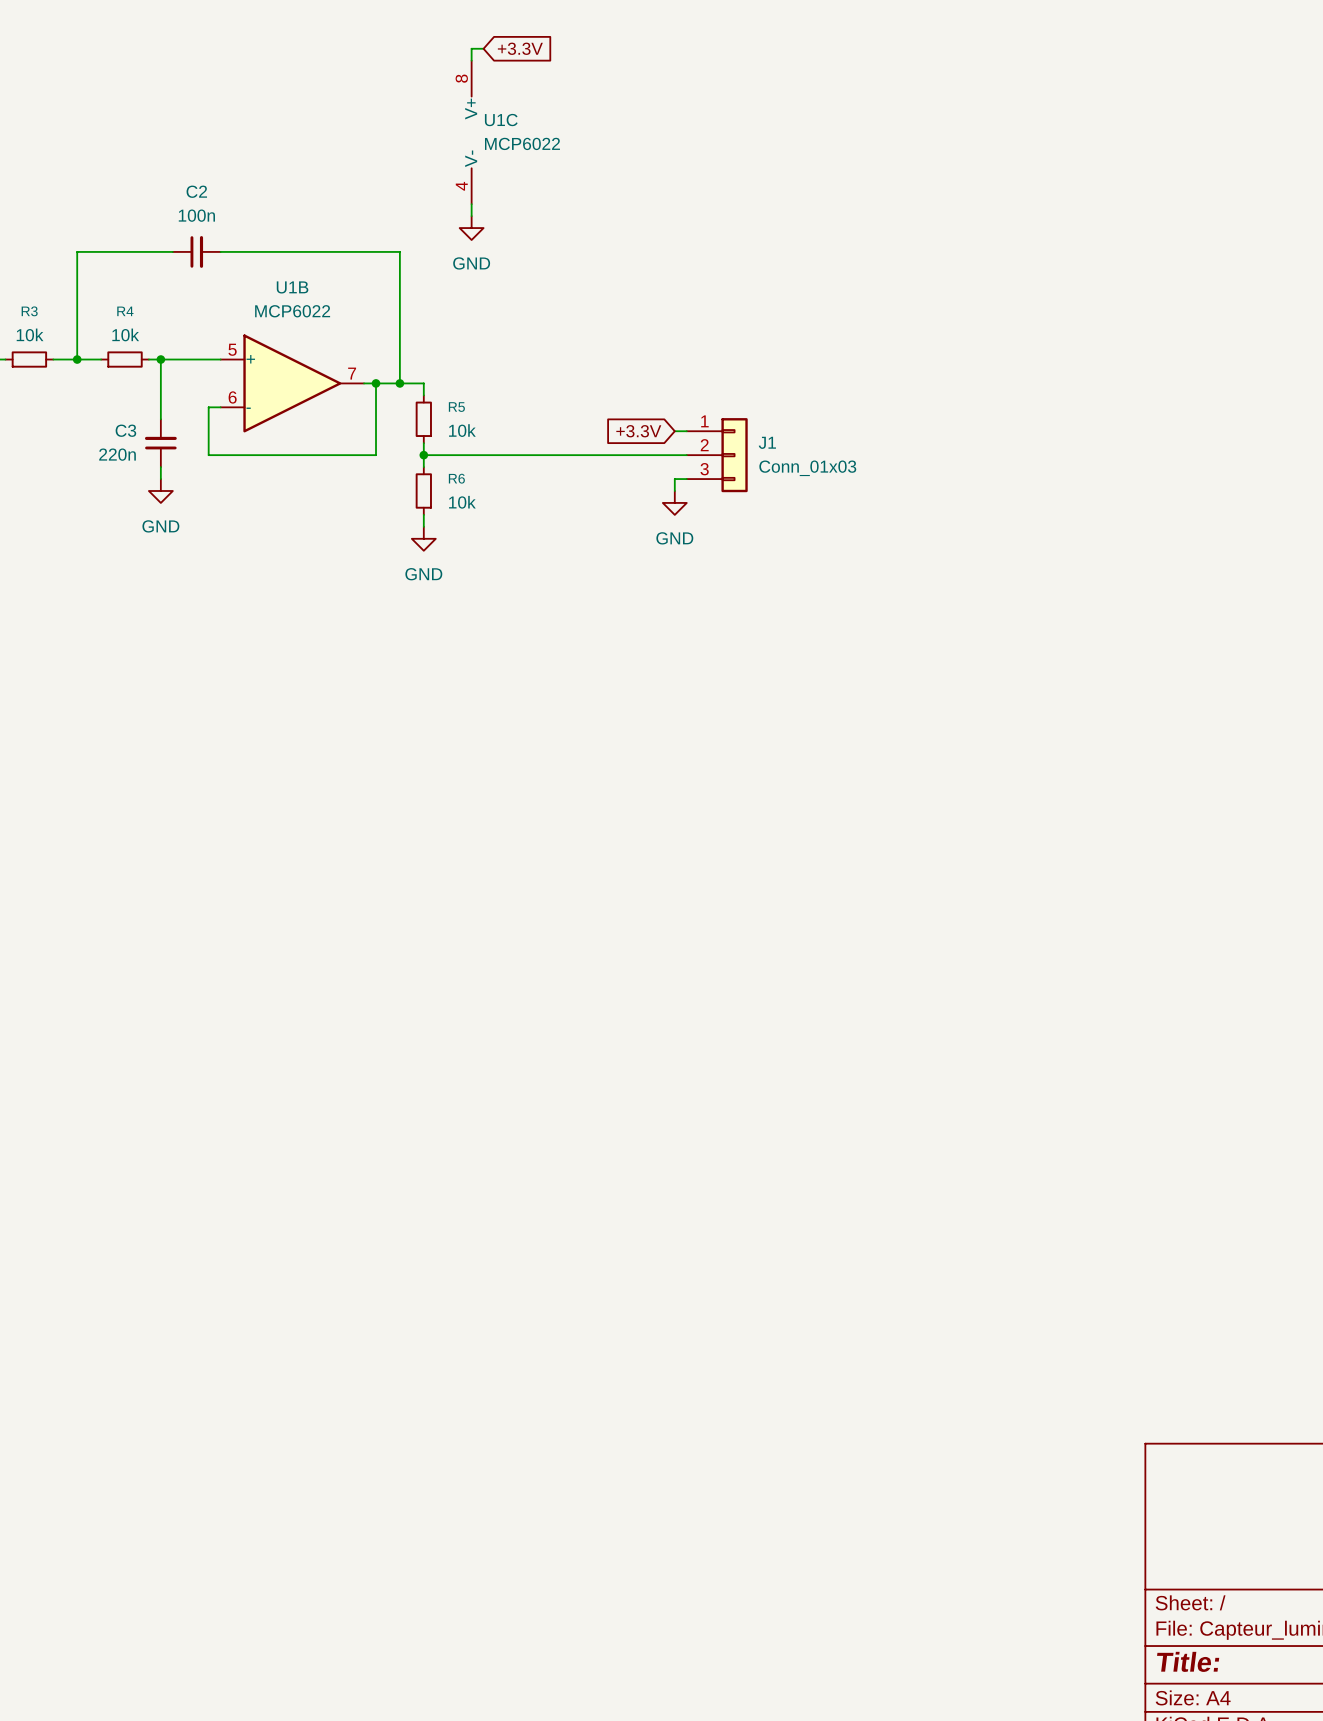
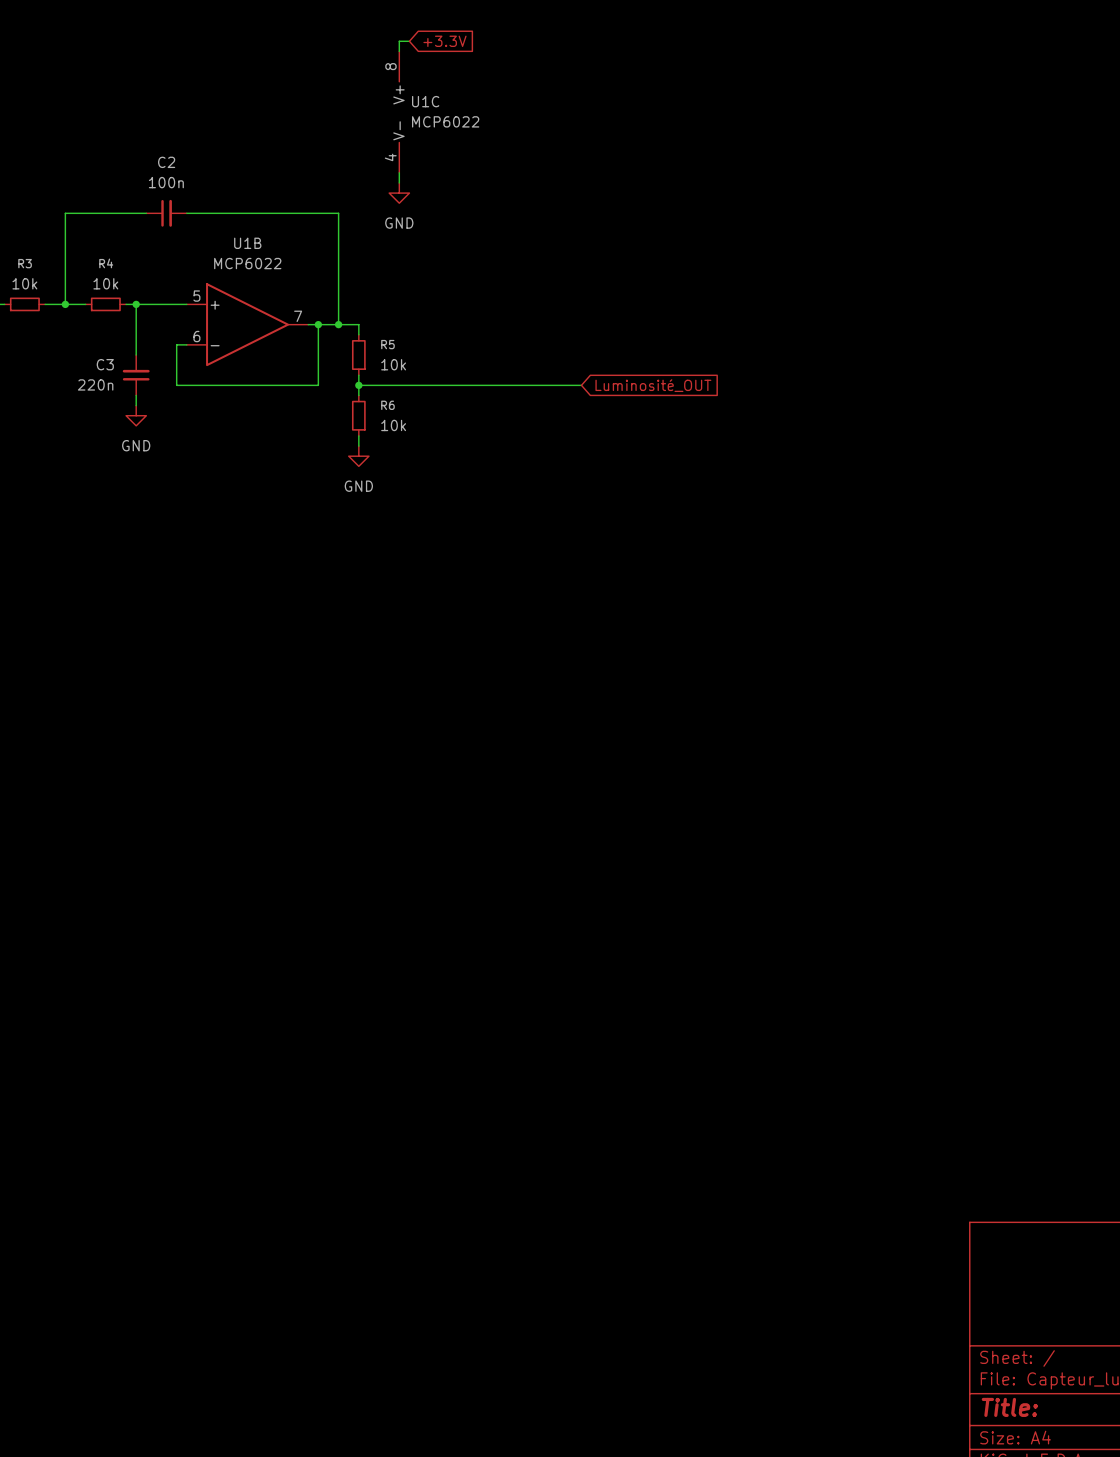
global label: +3.3V (638, 431) -> none
wire: (674, 431) (686, 431) -> none
J1: Conn_01x03 (717, 455) -> none
global label: none -> Luminosité_OUT (653, 385)
wire: (686, 479) (674, 479) (674, 490) -> none
power symbol: GND (674, 502) -> none

